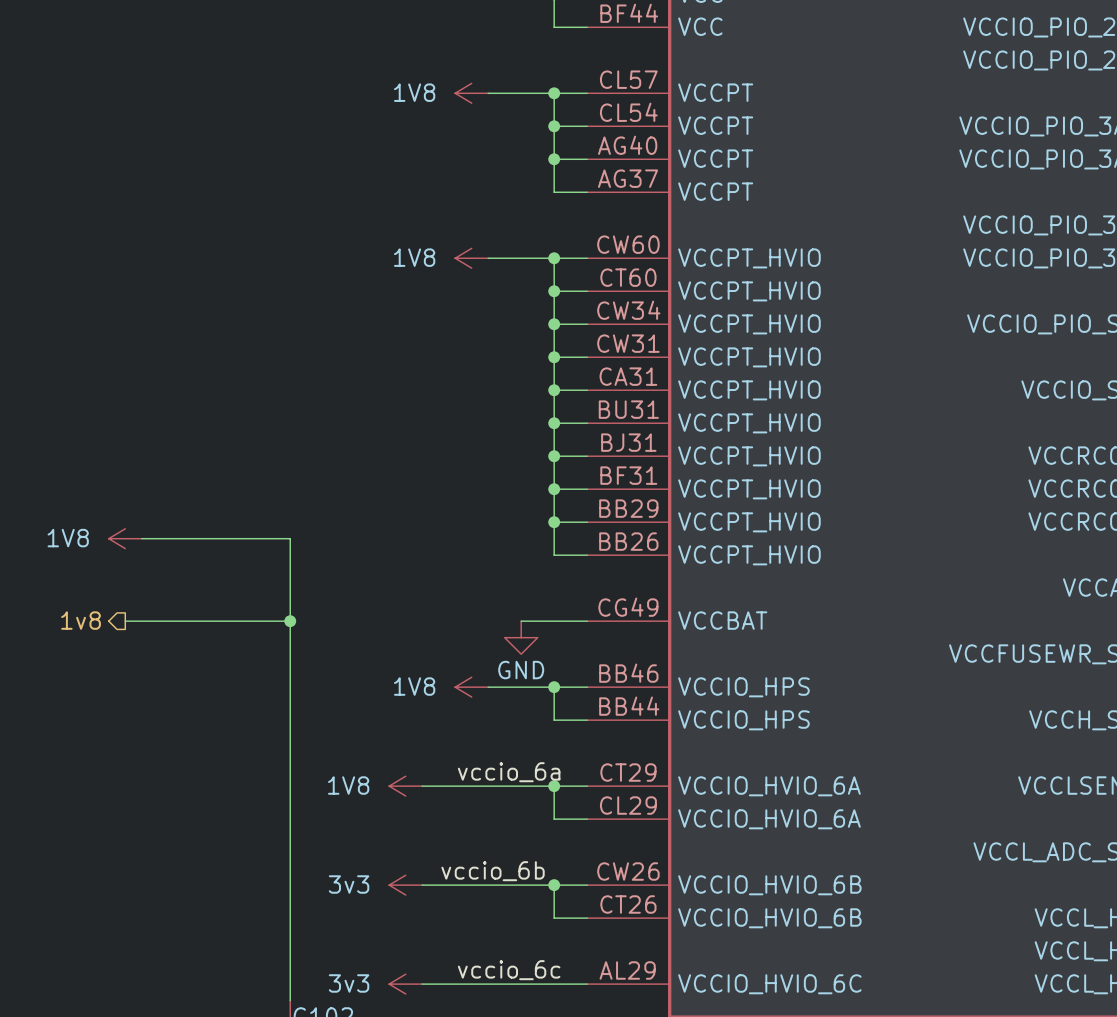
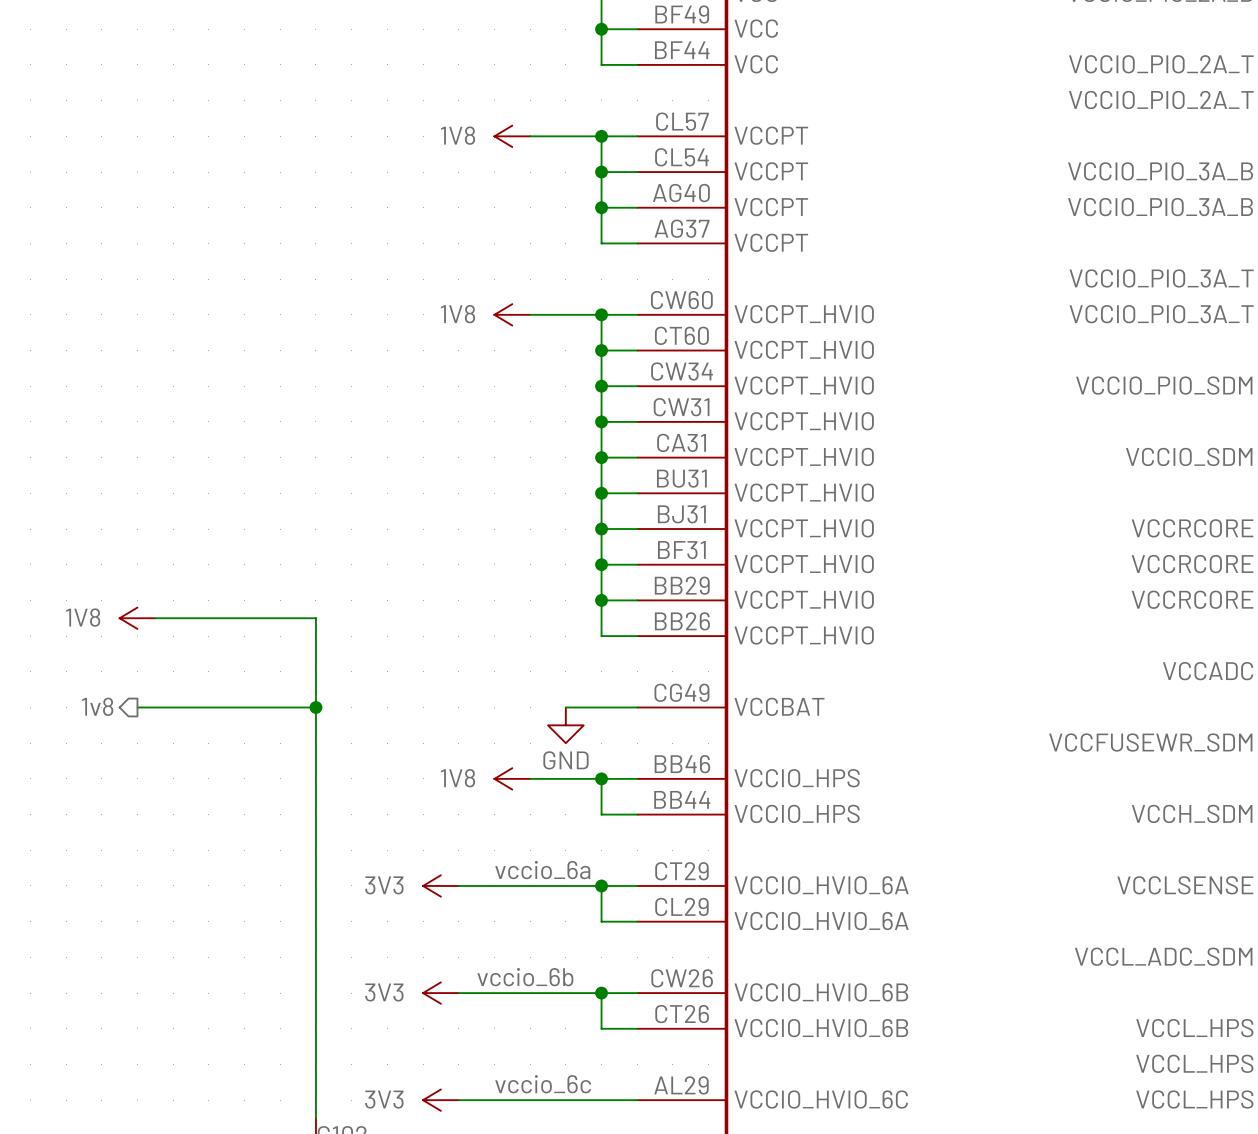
power symbol: 1V8 (405, 786) -> 3V3 (440, 885)
power symbol: 3v3 (405, 885) -> 3V3 (440, 993)
power symbol: 3v3 (405, 984) -> 3V3 (440, 1100)

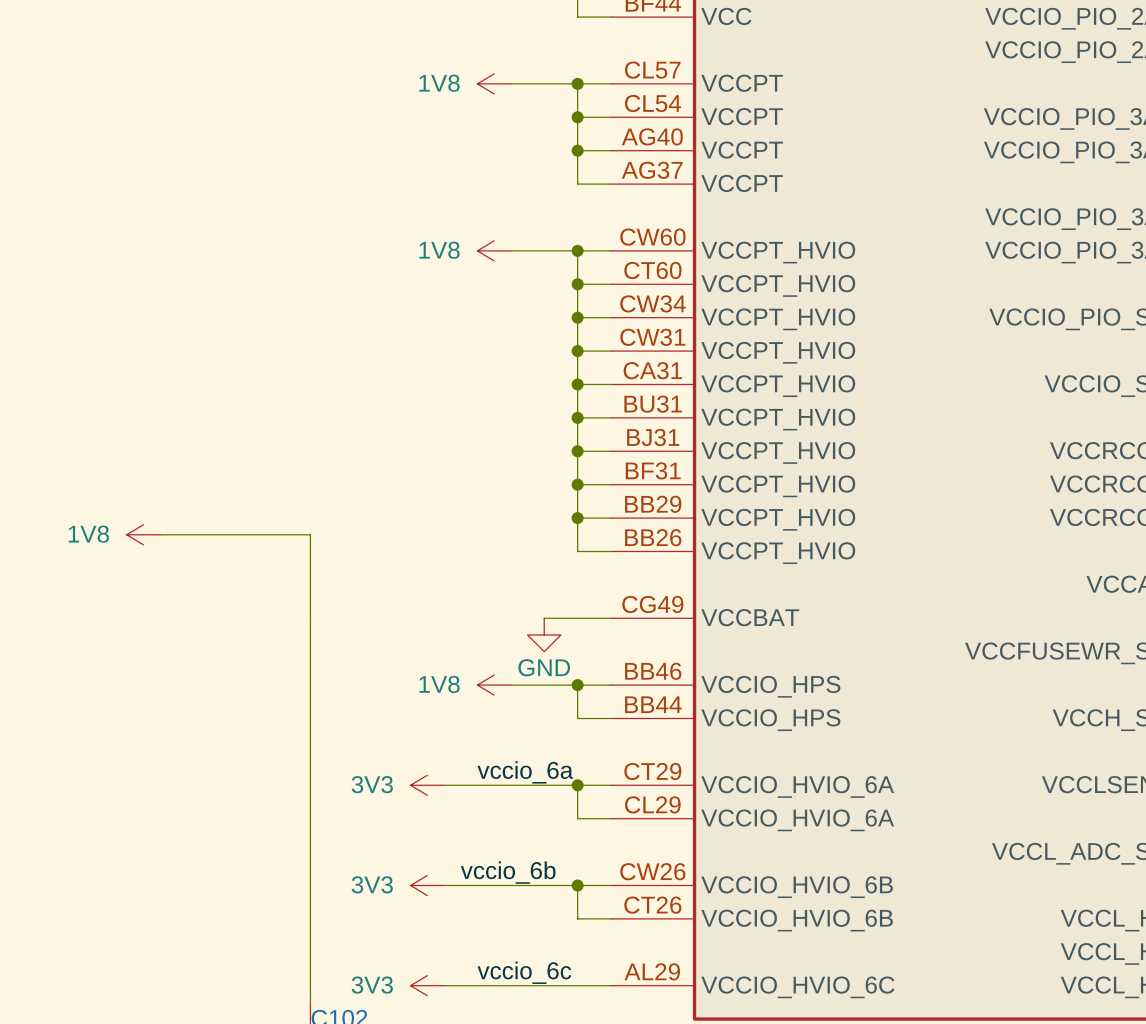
hierarchical label: 1v8 (97, 706) -> none
wire: (137, 707) (315, 707) -> none
junction: (315, 707) -> none

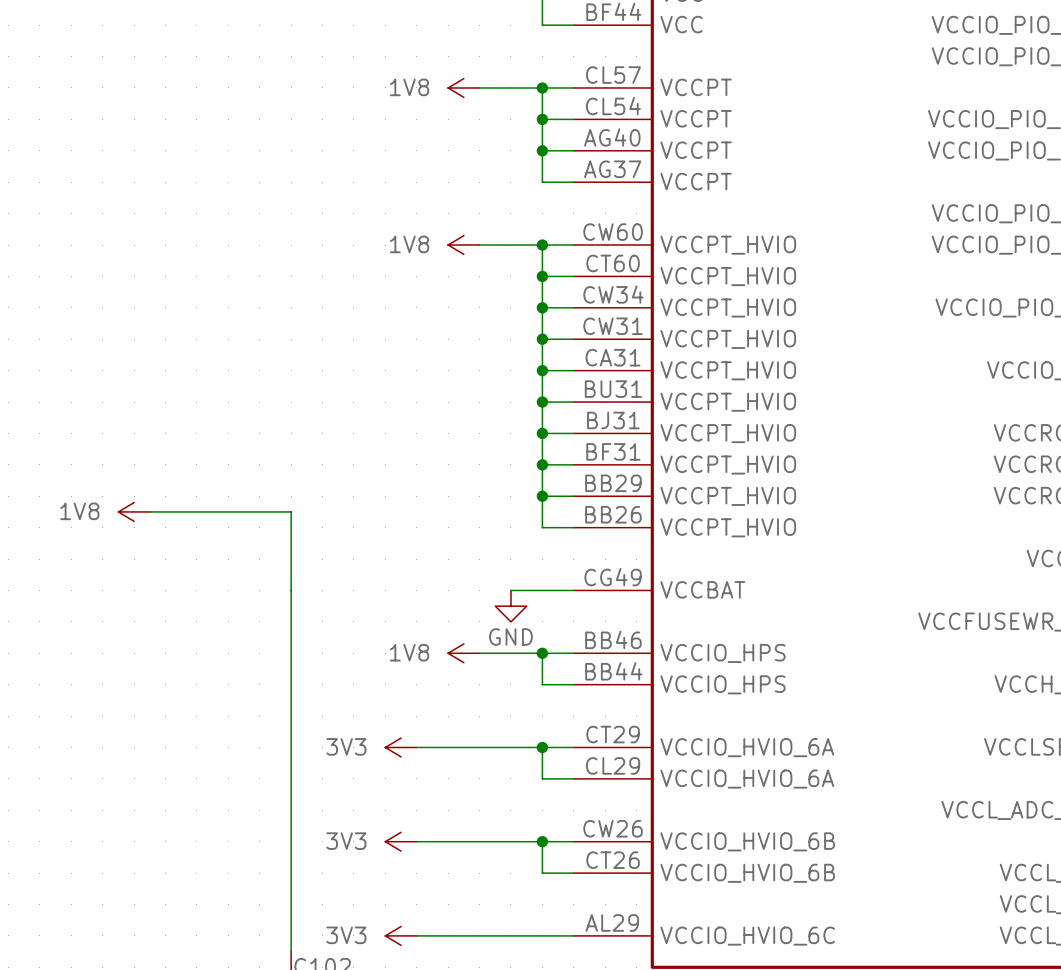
label: vccio_6a (525, 772) -> none
label: vccio_6b (508, 872) -> none
label: vccio_6c (524, 972) -> none

